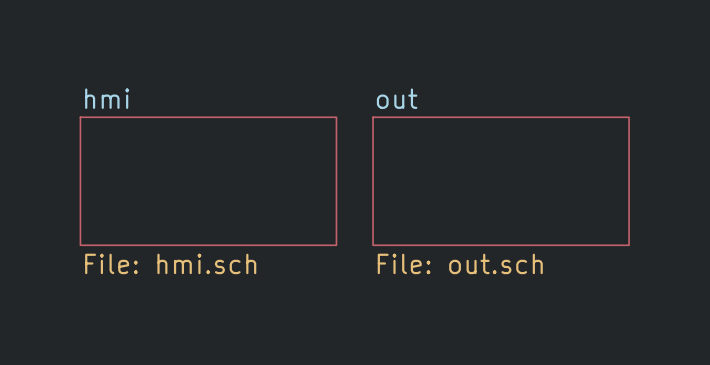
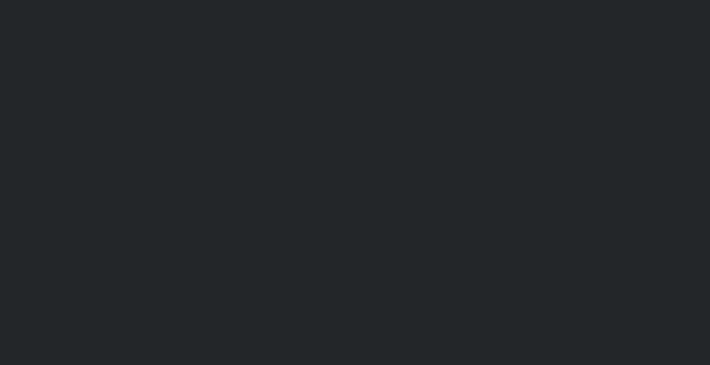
sheet hmi: File: hmi.sch (208, 181) -> none
sheet out: File: out.sch (501, 181) -> none

